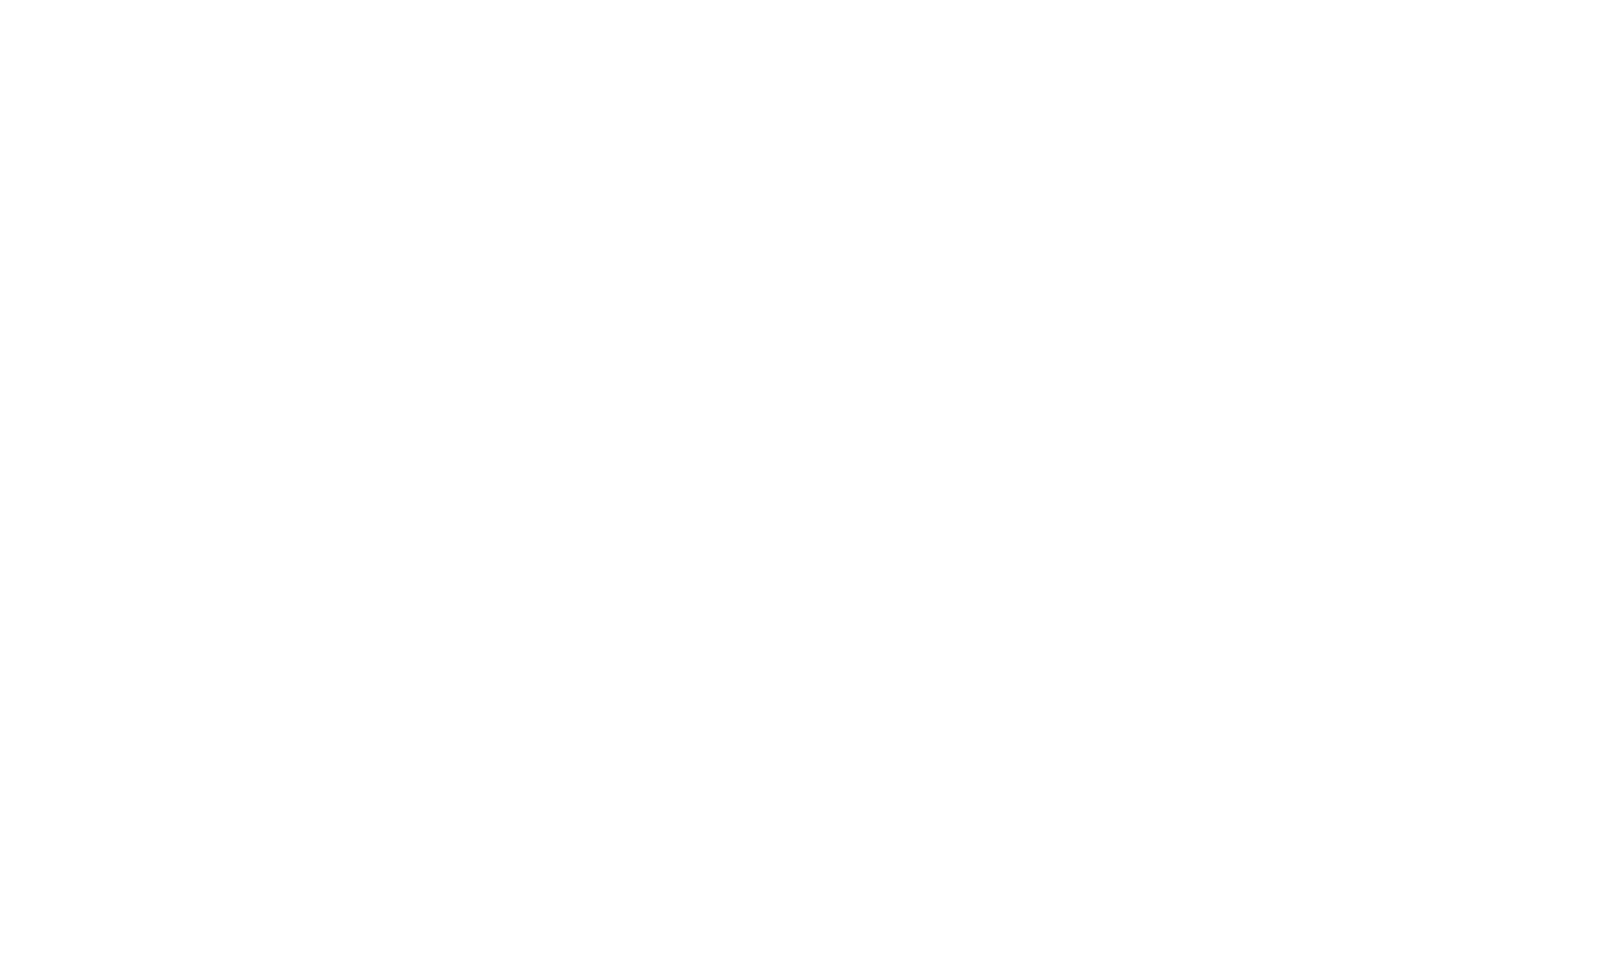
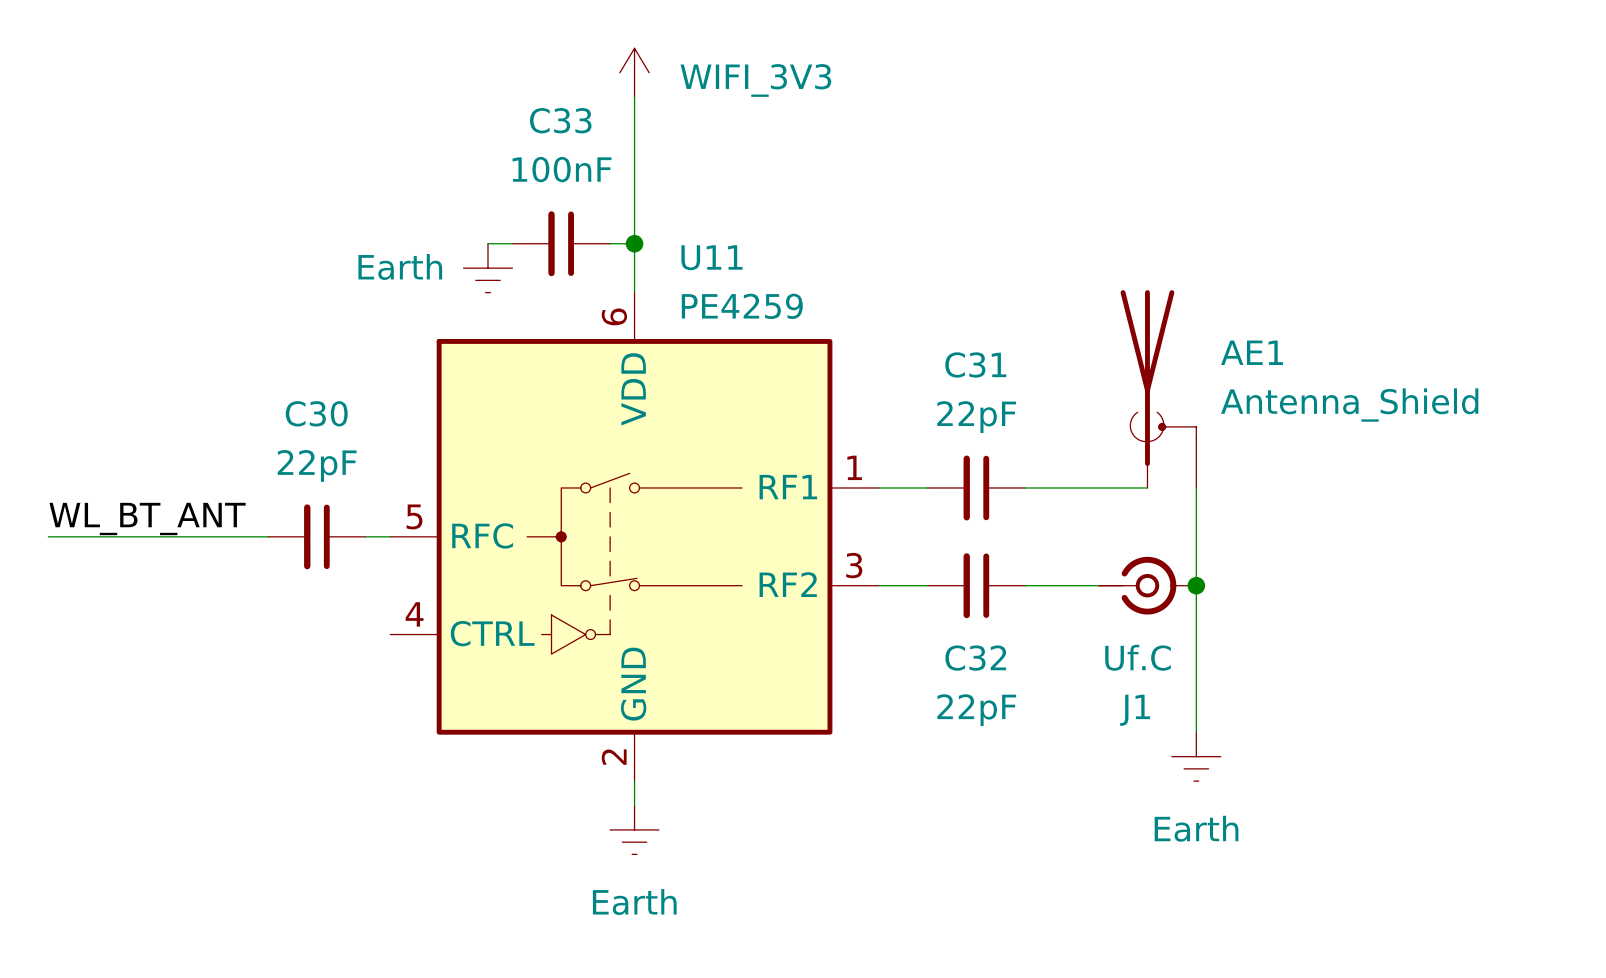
power symbol: none -> WIFI_3V3 (634, 72)
wire: none -> (634, 97) (634, 292)
wire: none -> (487, 243) (512, 243)
C33: none -> 100nF (561, 243)
wire: none -> (610, 243) (634, 243)
junction: none -> (634, 243)
power symbol: none -> Earth (487, 268)
AE1: none -> Antenna_Shield (1158, 389)
wire: none -> (878, 487) (927, 487)
C31: none -> 22pF (976, 487)
wire: none -> (1025, 487) (1147, 487)
wire: none -> (1196, 487) (1196, 732)
label: none -> WL_BT_ANT (147, 518)
wire: none -> (48, 536) (268, 536)
C30: none -> 22pF (317, 536)
wire: none -> (365, 536) (390, 536)
U11: none -> PE4259 (634, 536)
wire: none -> (878, 585) (927, 585)
C32: none -> 22pF (976, 585)
wire: none -> (1025, 585) (1098, 585)
J1: none -> Uf.C (1147, 585)
junction: none -> (1196, 585)
power symbol: none -> Earth (1196, 756)
wire: none -> (634, 781) (634, 805)
power symbol: none -> Earth (634, 829)

